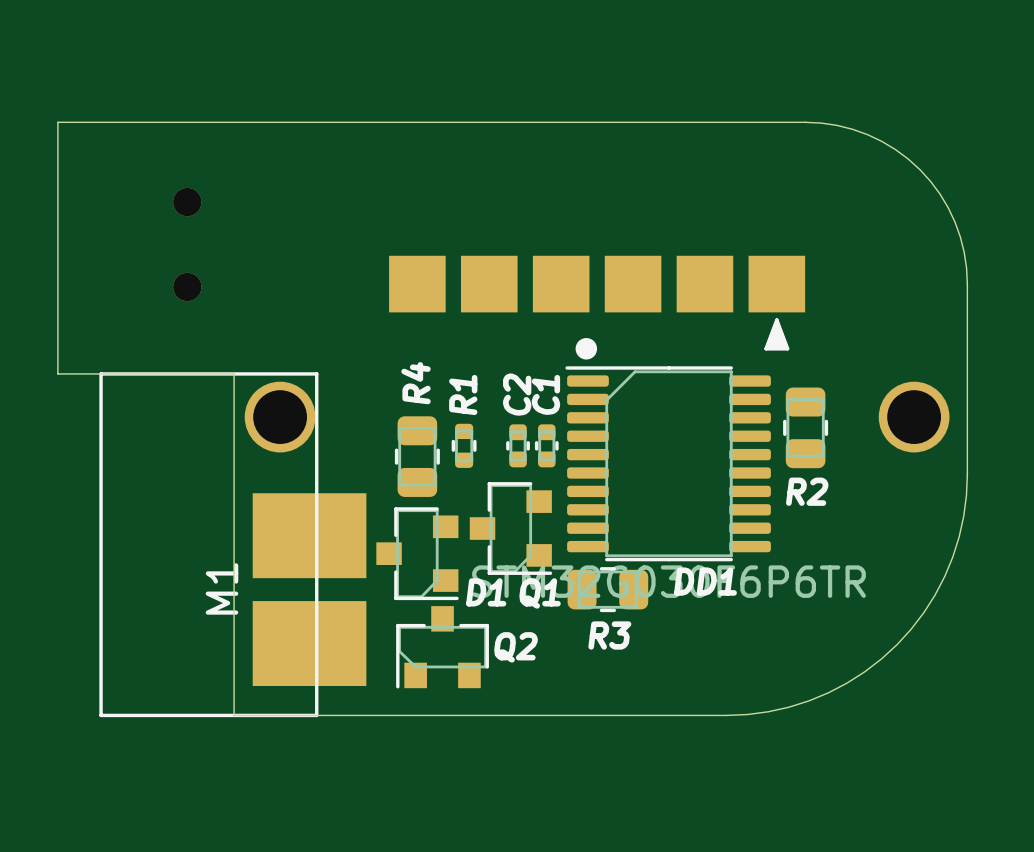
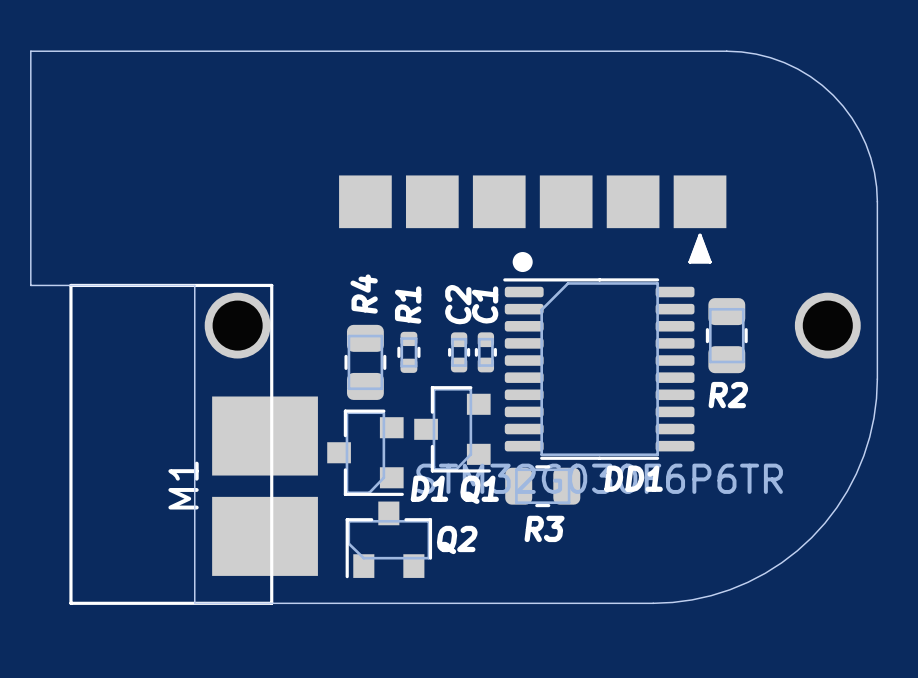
part: (187, 244) -> none

